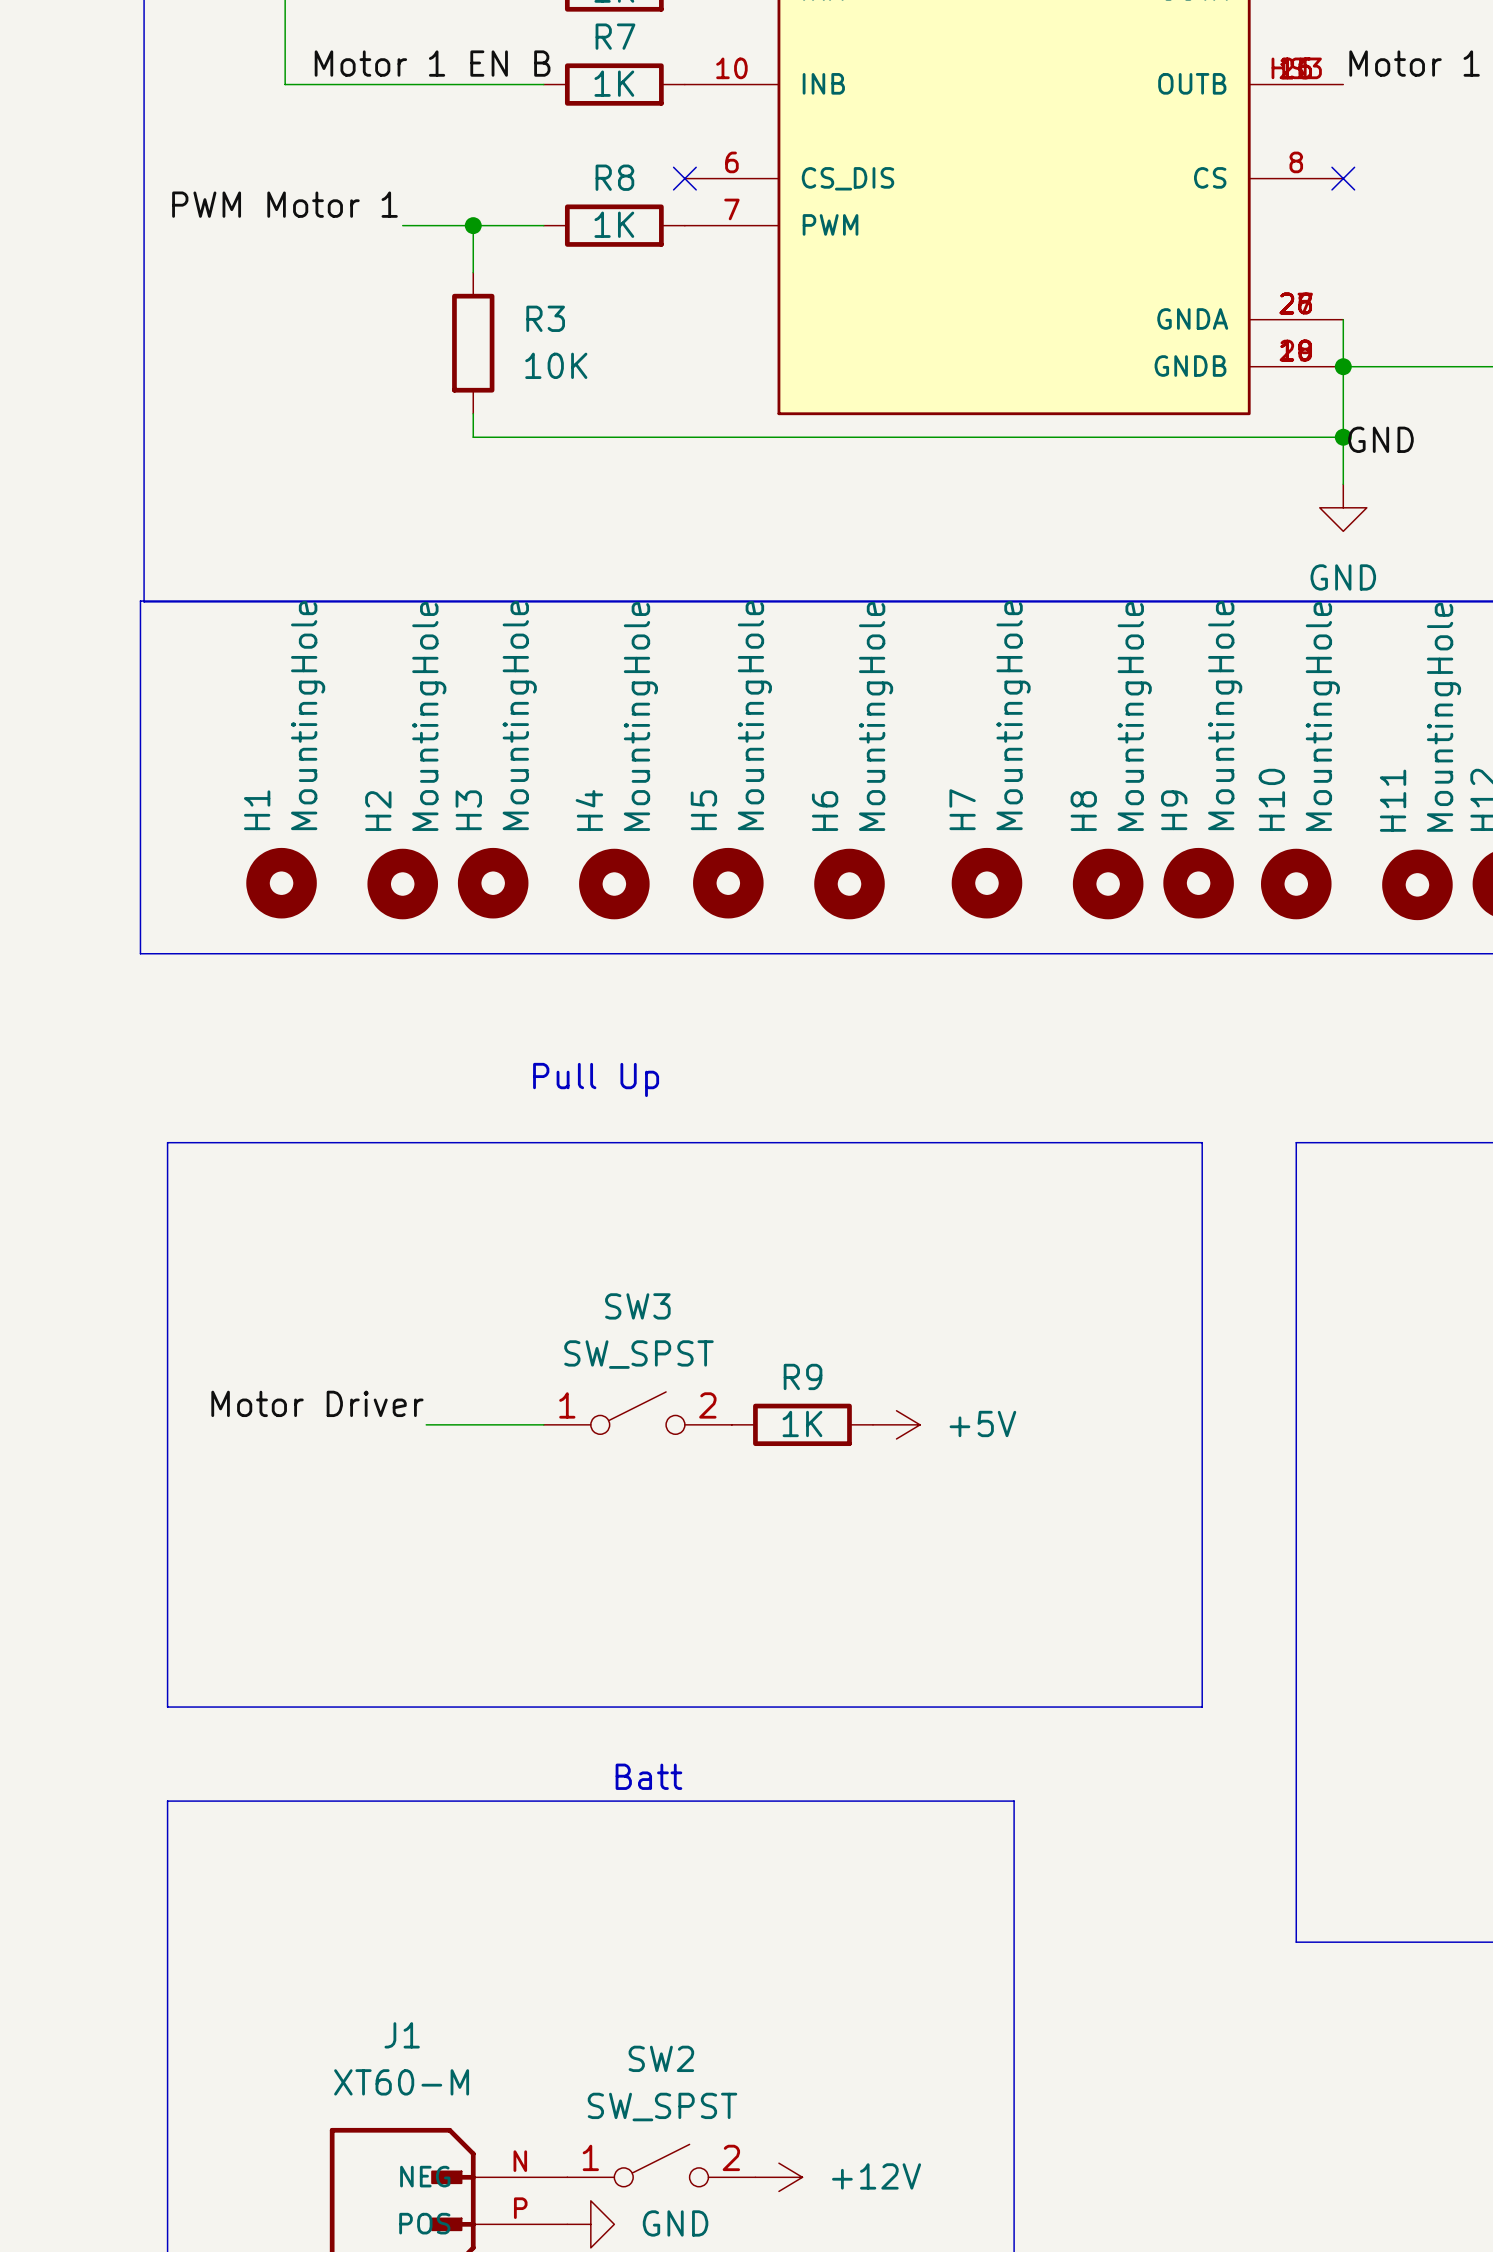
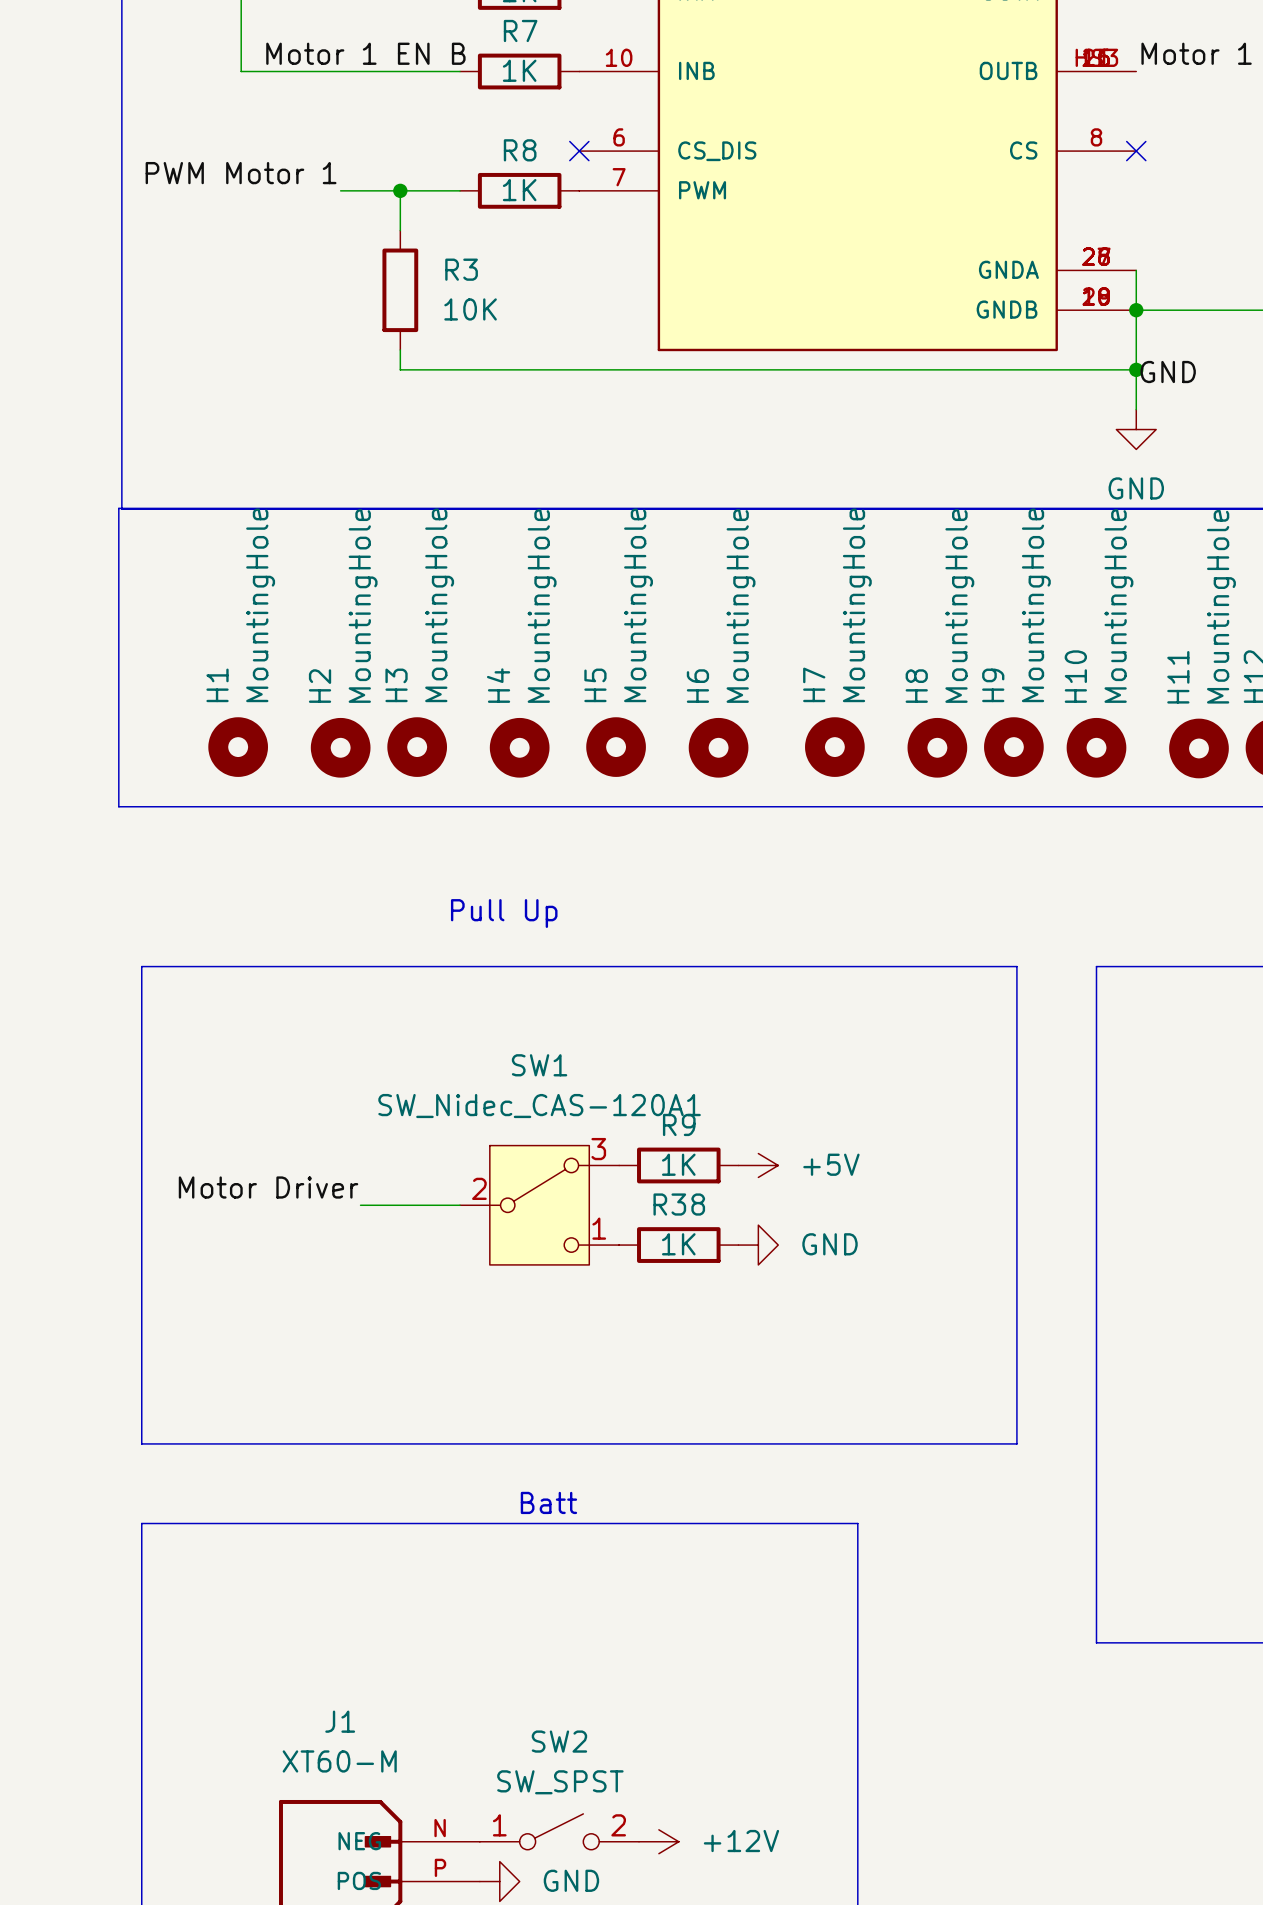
SW3: SW_SPST (637, 1413) -> none
SW1: none -> SW_Nidec_CAS-120A1 (539, 1205)
R9 position: (802, 1424) -> (678, 1165)
power symbol position: +5V (896, 1424) -> +5V (758, 1165)
R38: none -> 1K (678, 1245)
power symbol: none -> GND (758, 1245)

